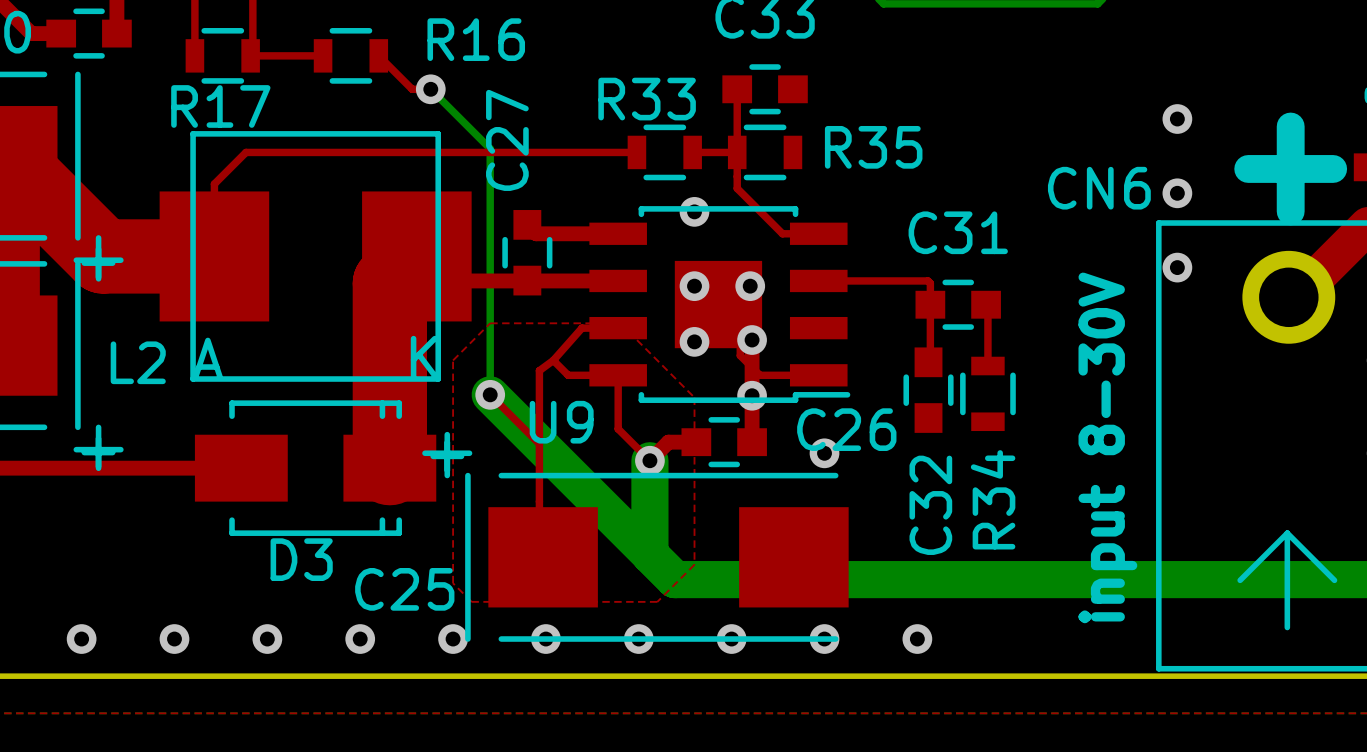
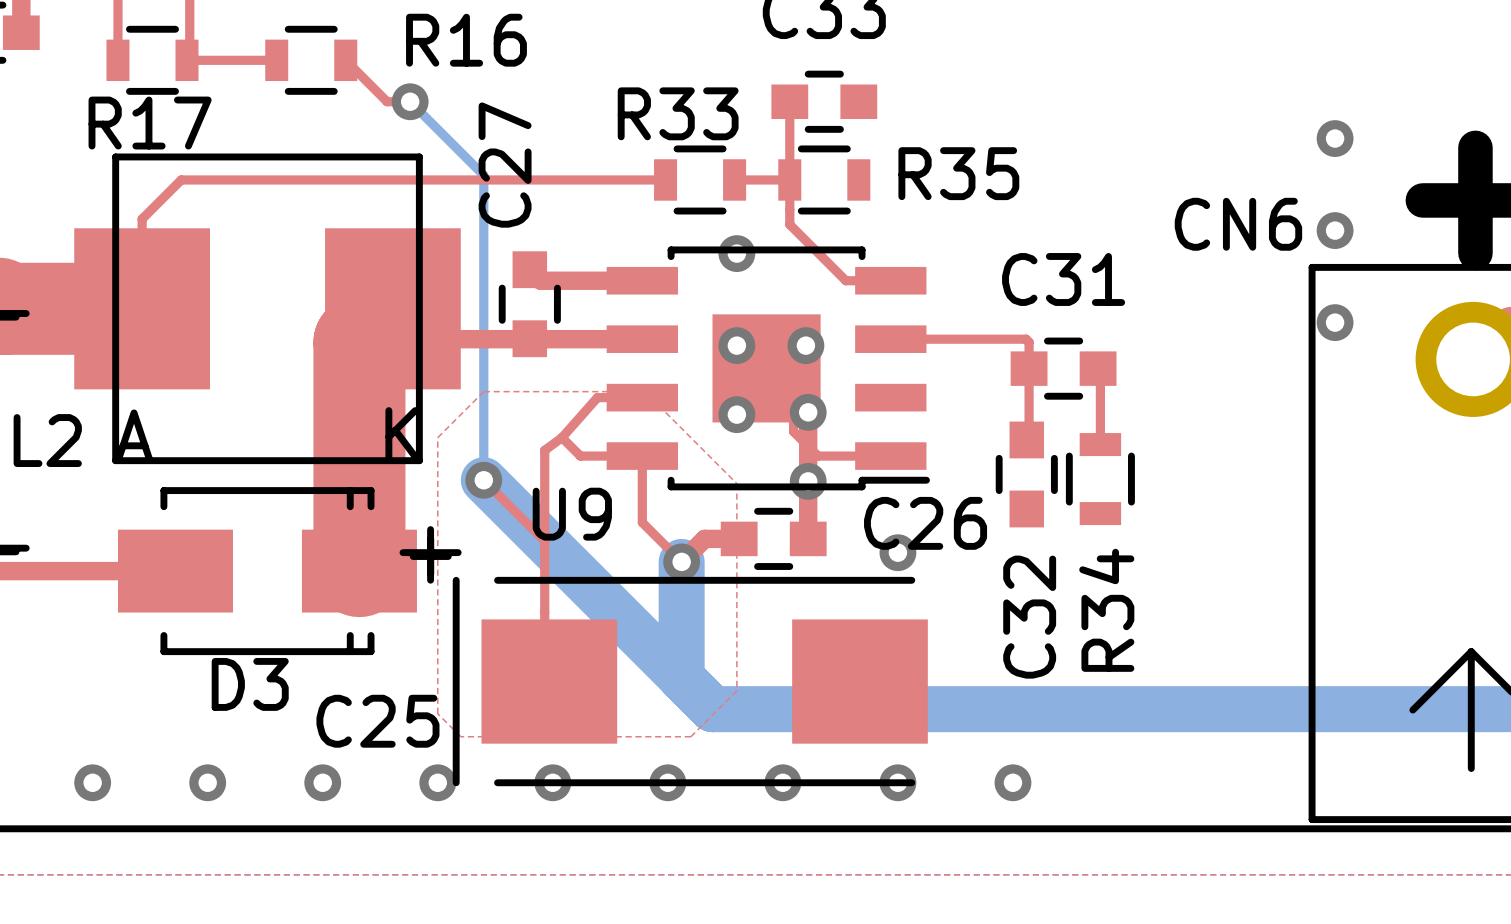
text: input 8-30V (1107, 447) -> none

